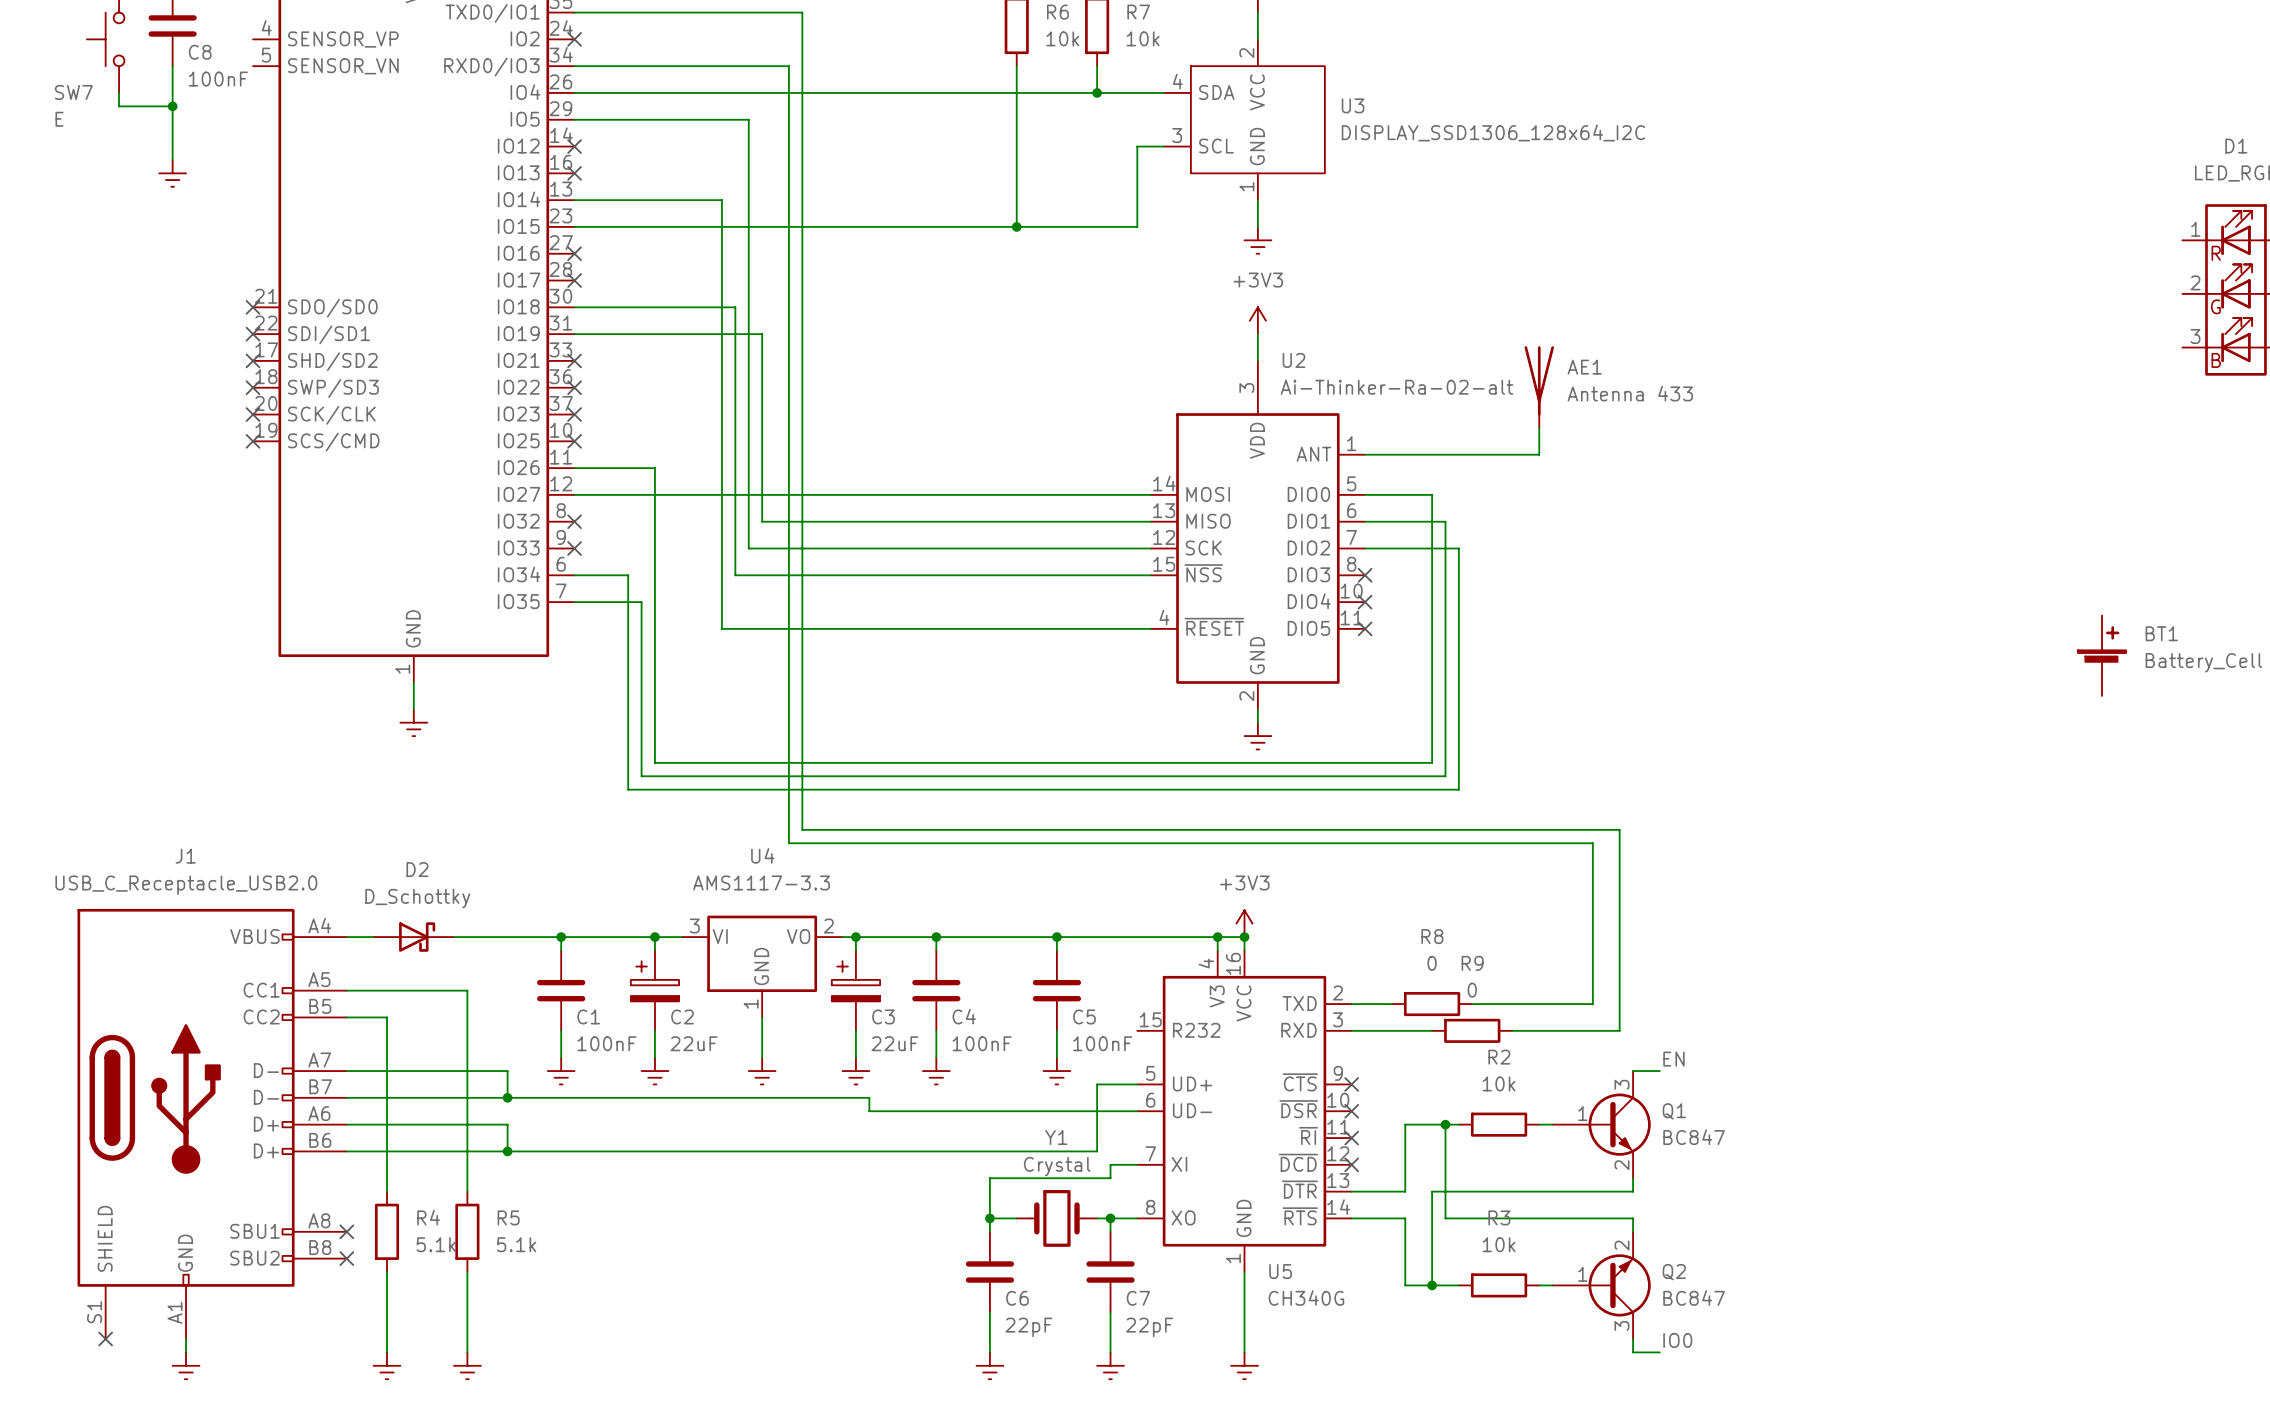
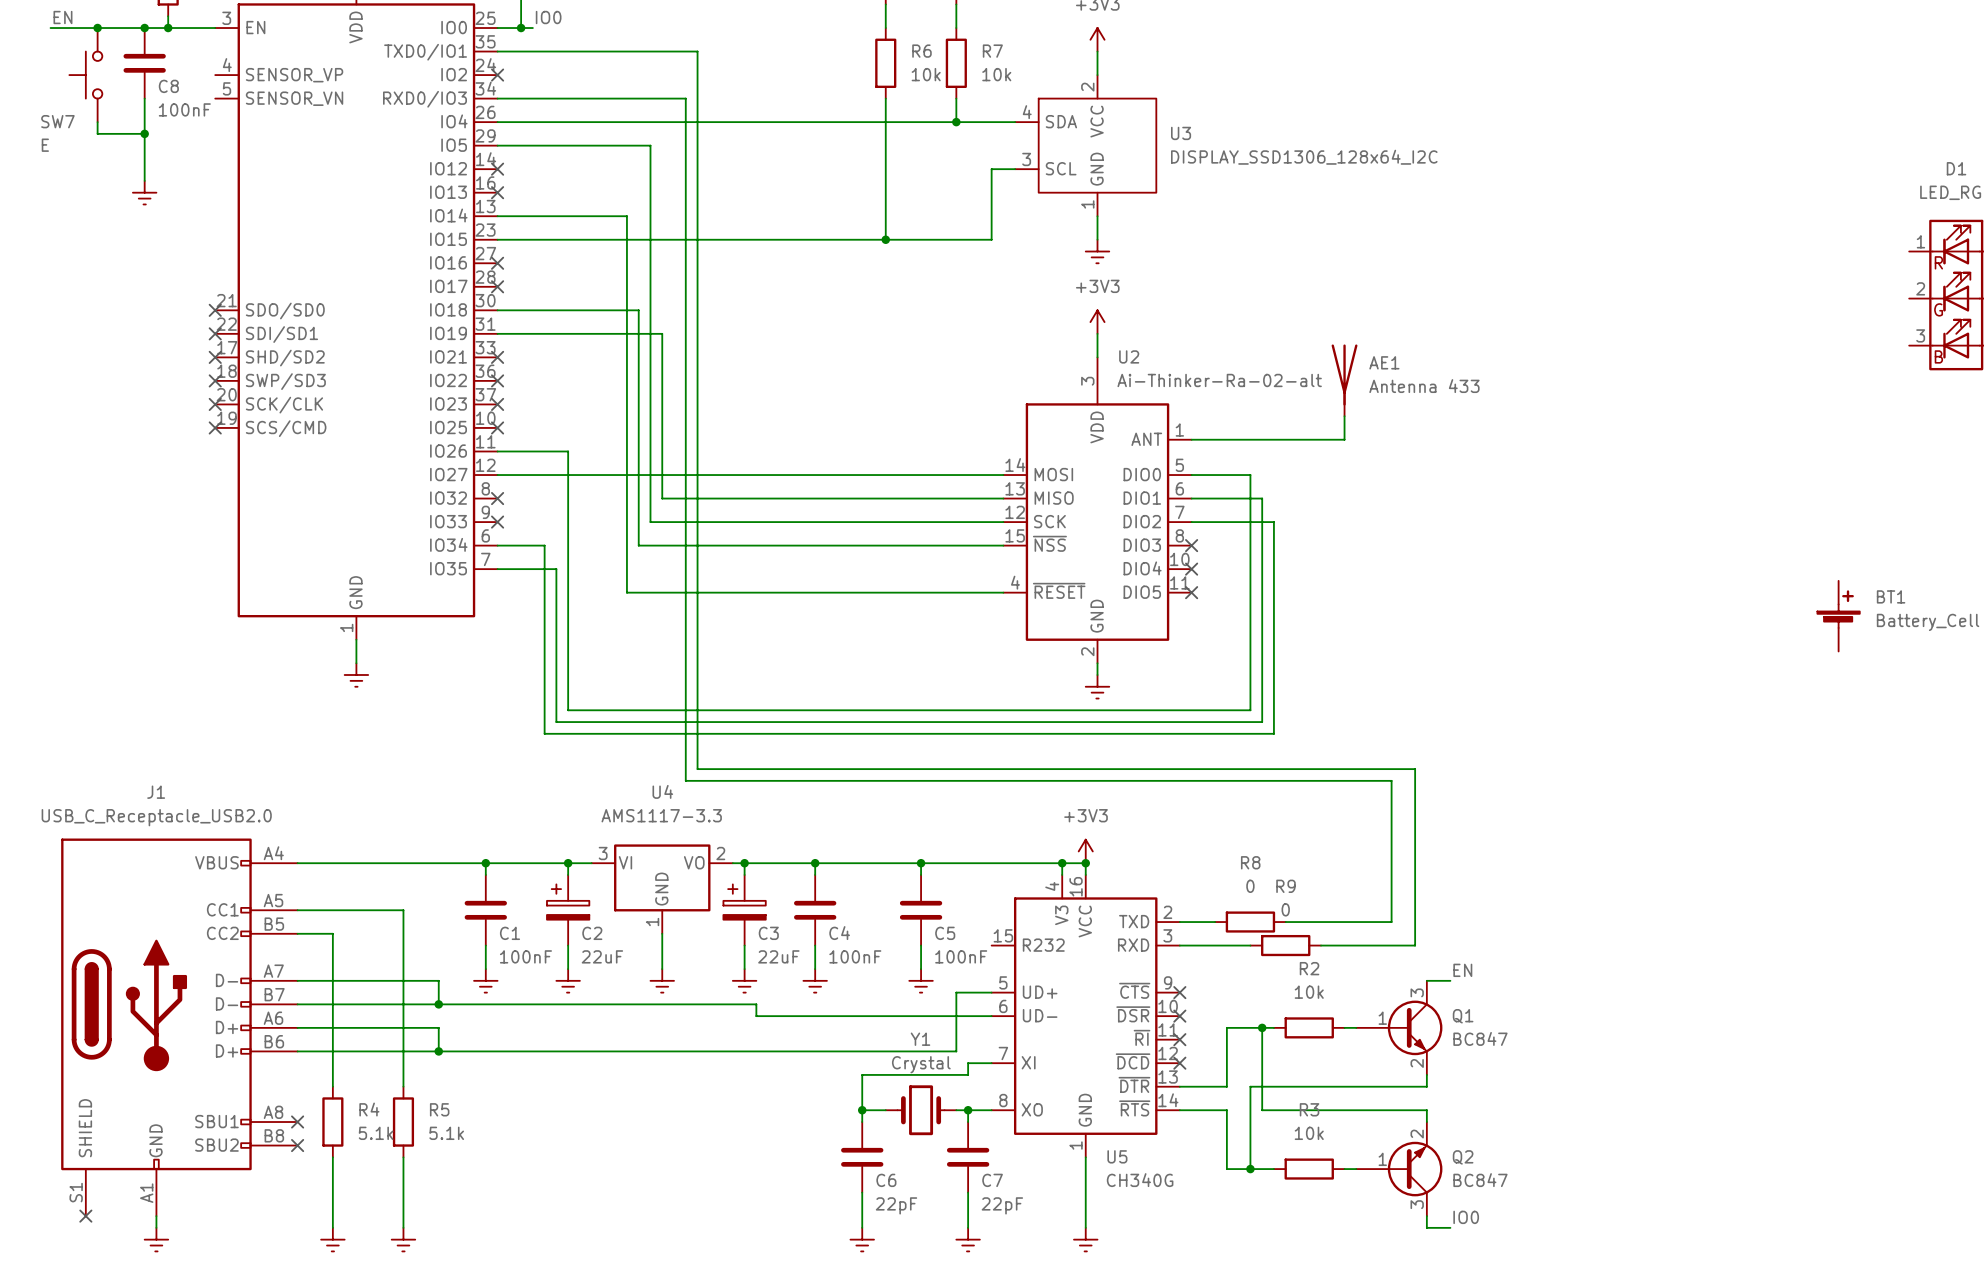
D2: D_Schottky (413, 937) -> none

